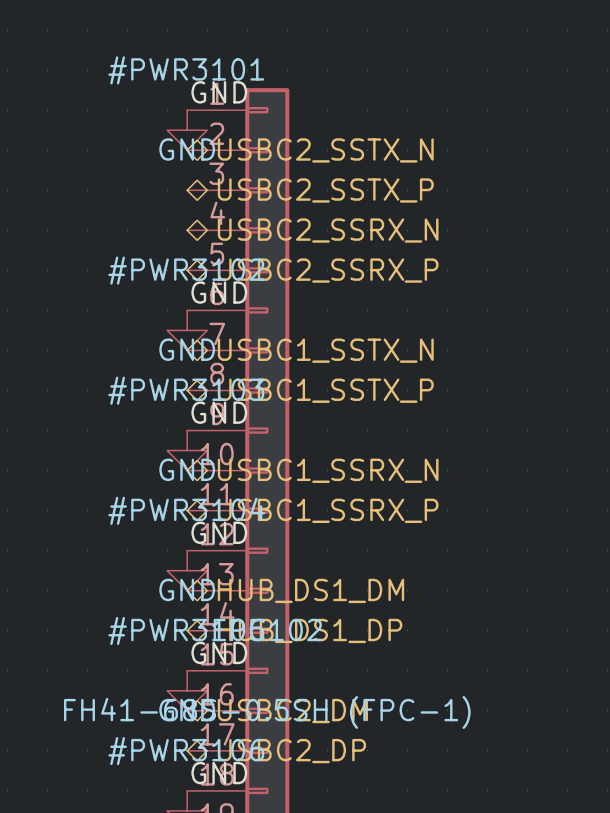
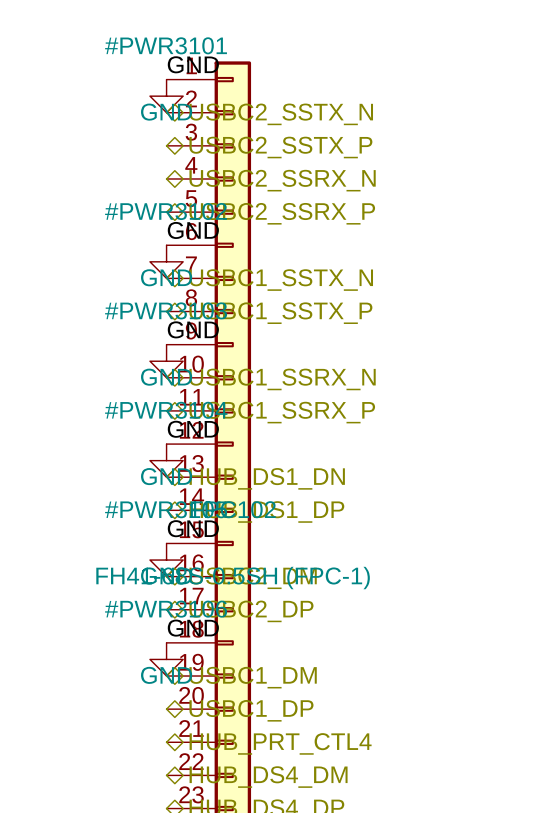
hierarchical label: HUB_DS1_DM (310, 590) -> HUB_DS1_DN (267, 478)

